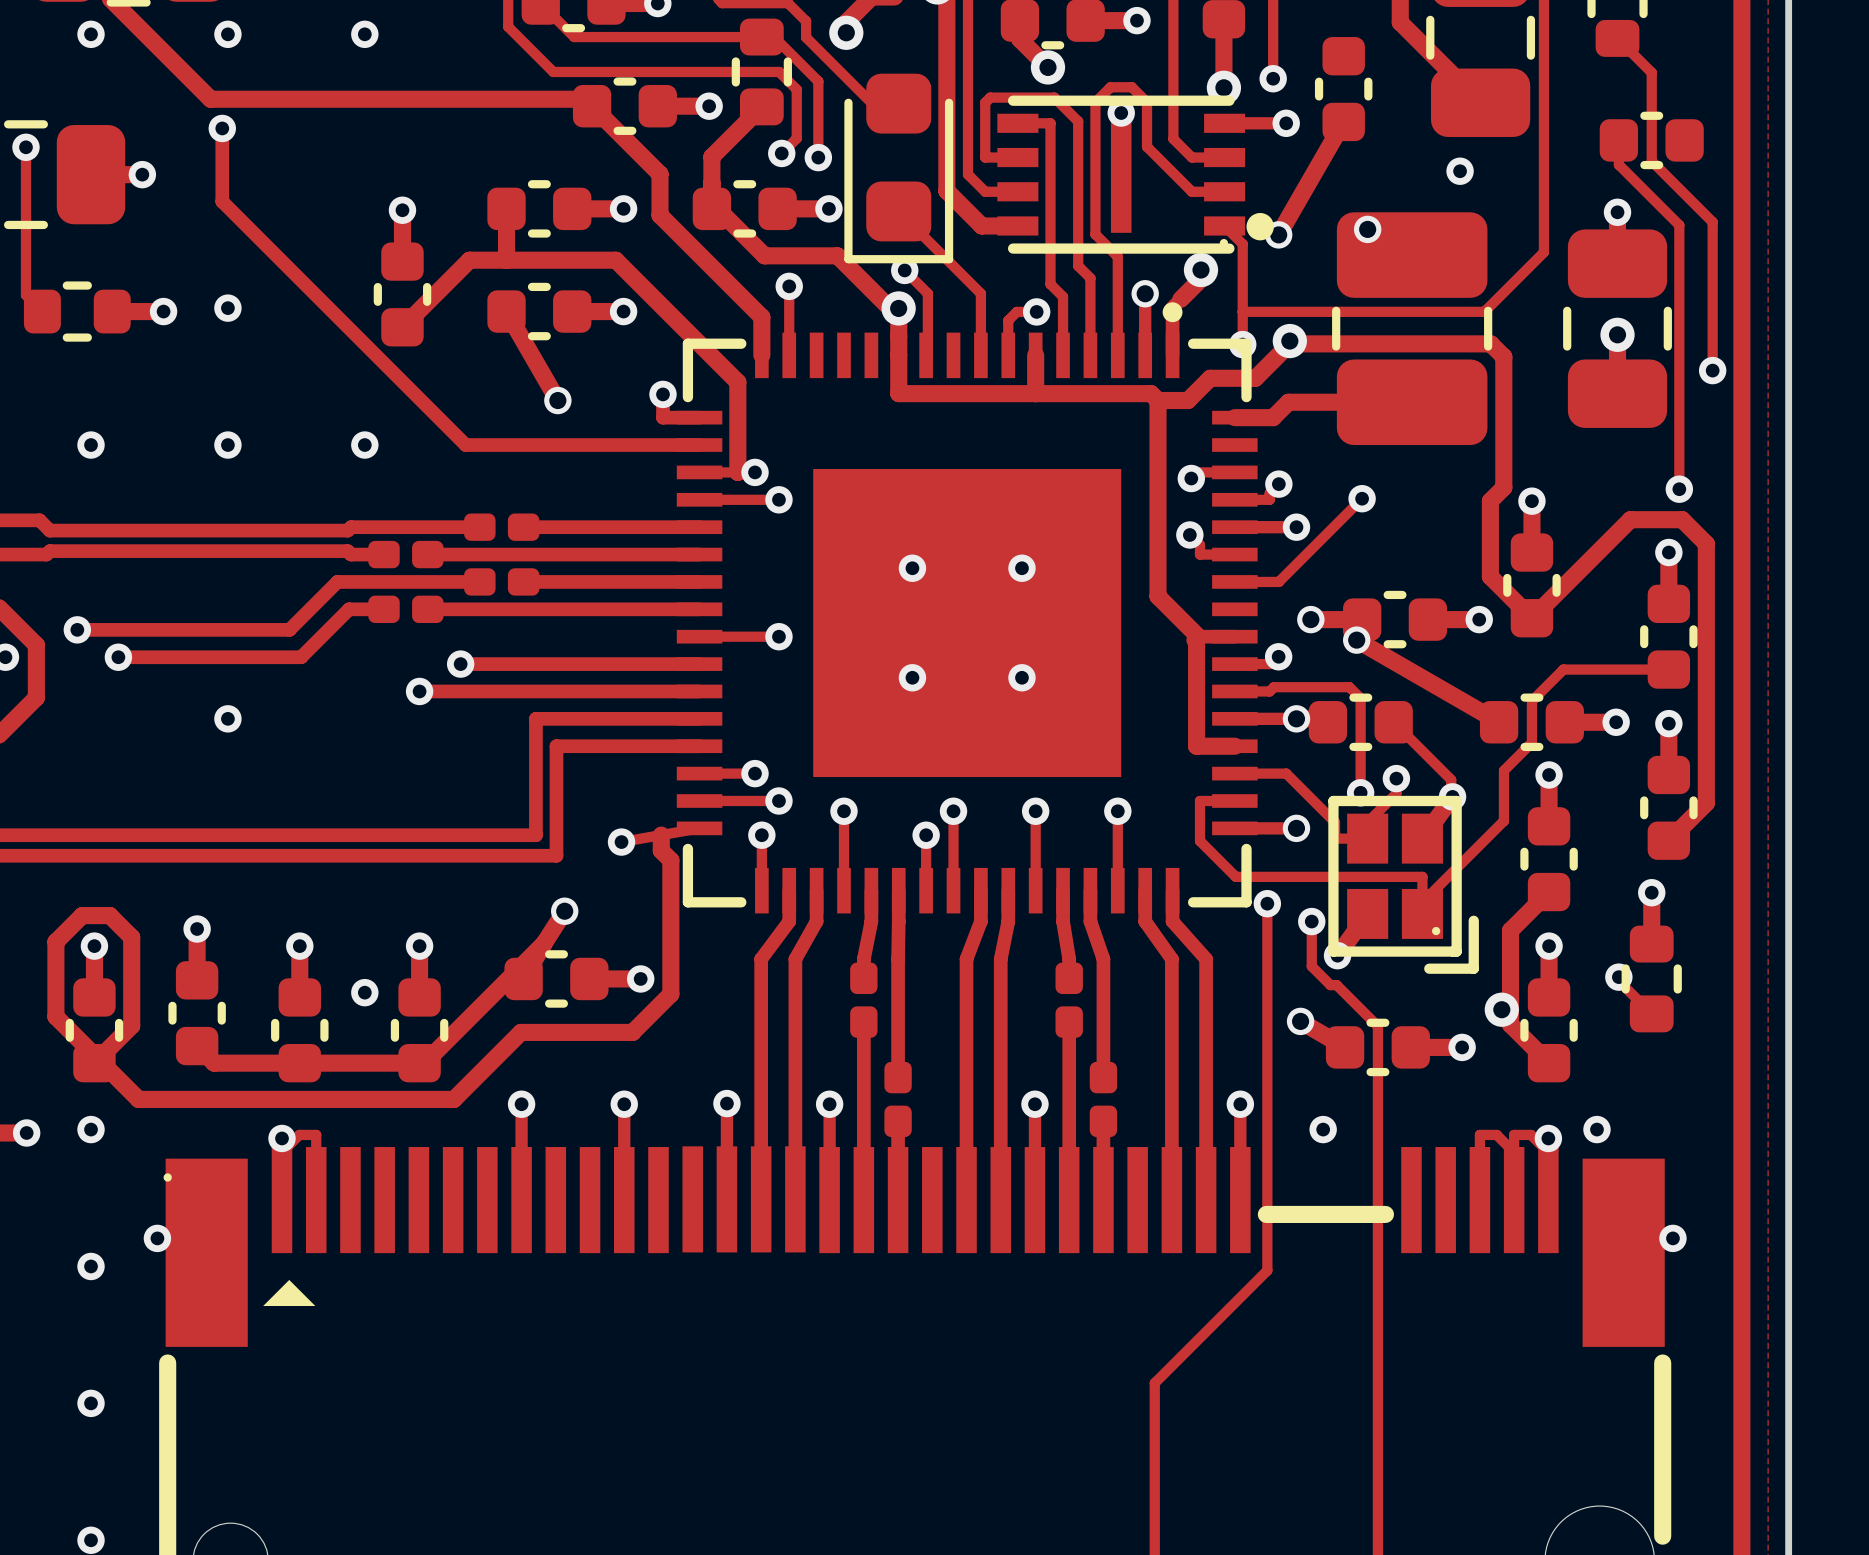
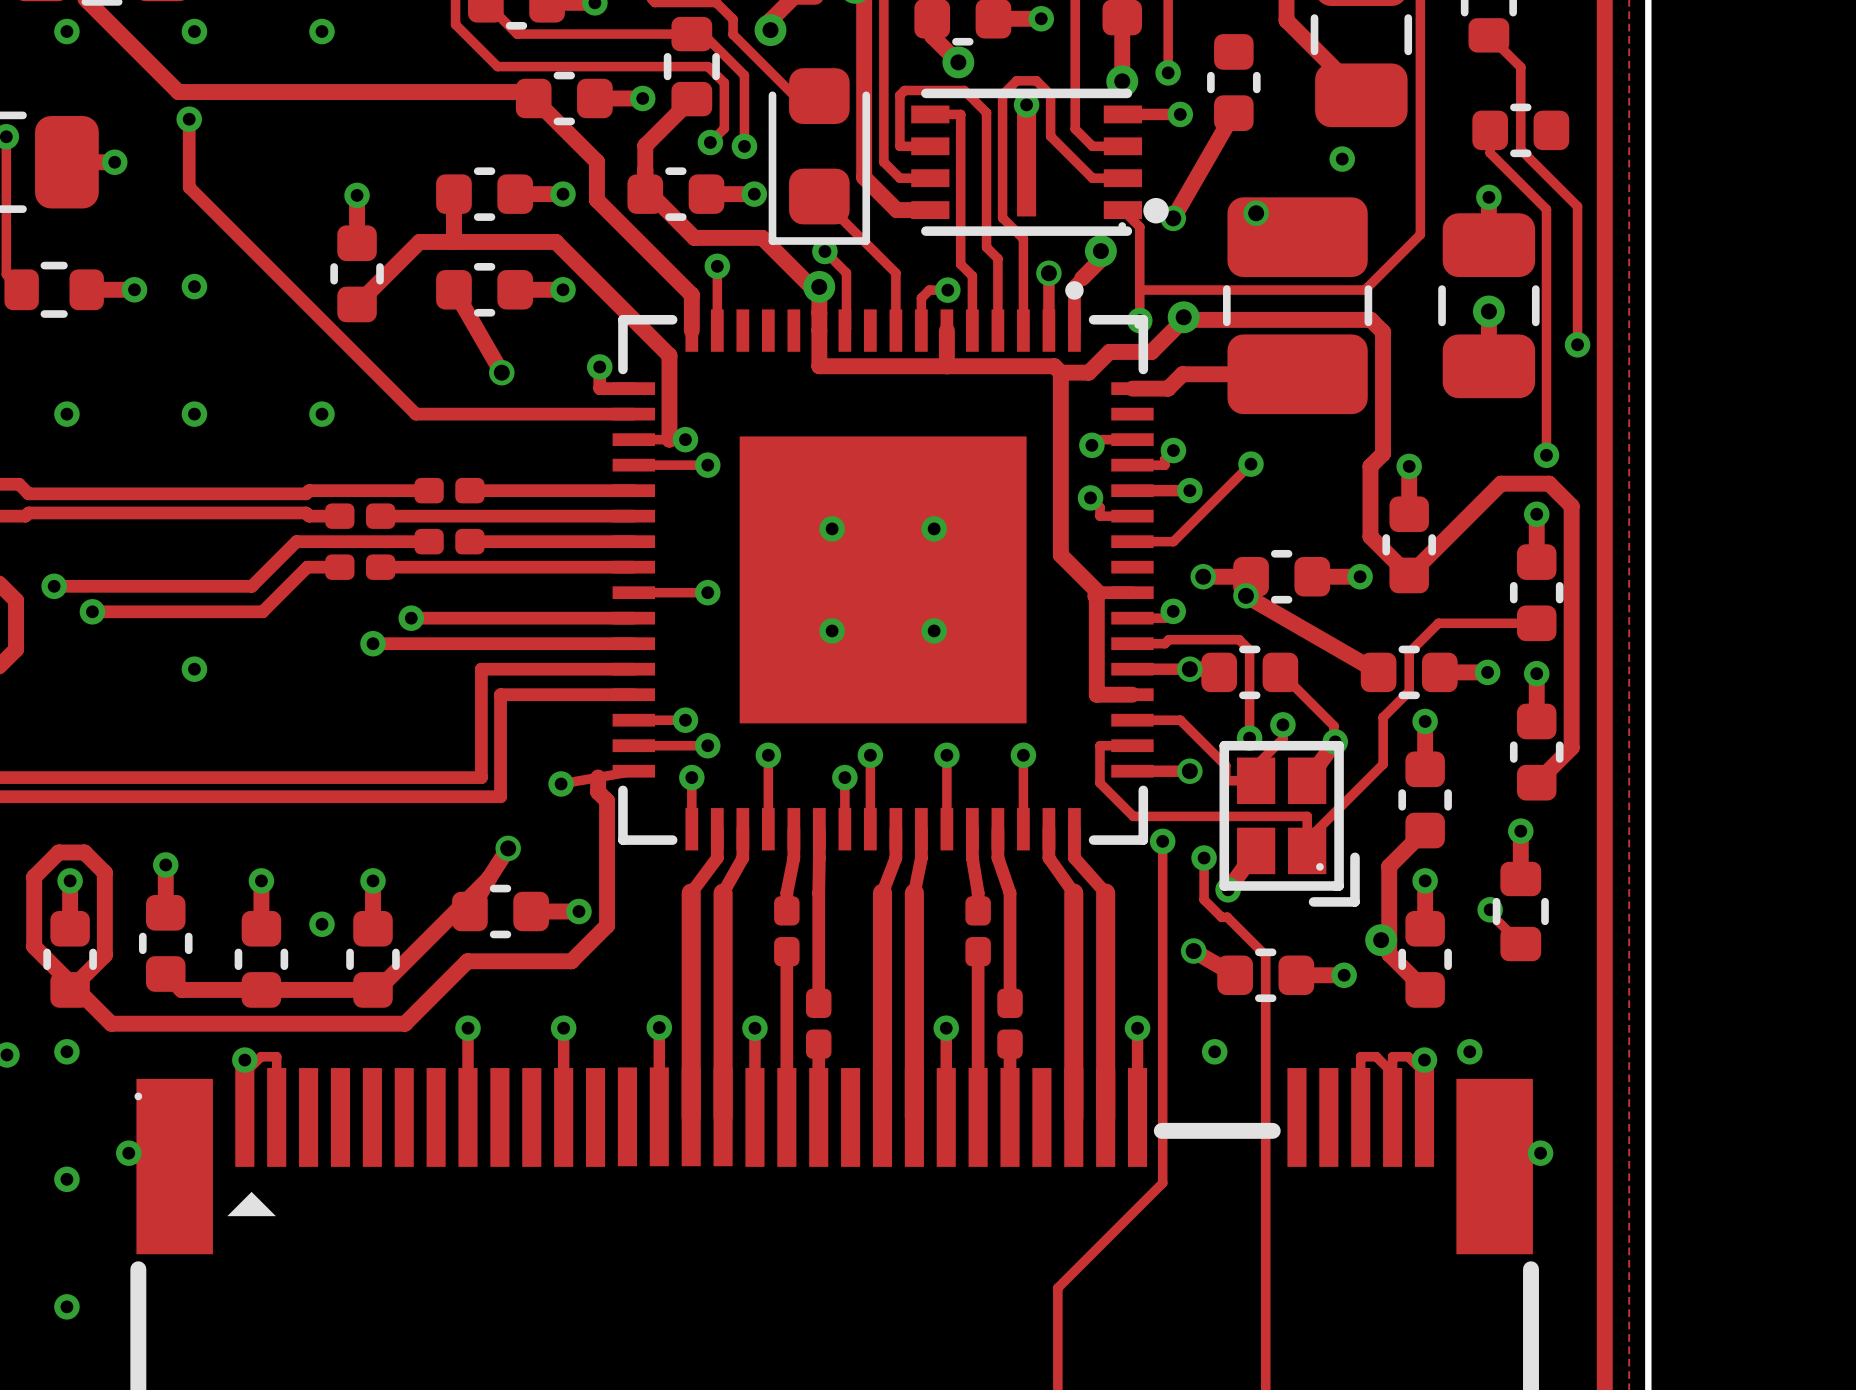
track width: thin (761, 959) (761, 1199) -> thick (691, 893) (691, 1116)
track width: thin (795, 959) (795, 1199) -> thick (723, 893) (723, 1116)
track width: thin (966, 959) (966, 1200) -> thick (882, 893) (882, 1117)
track width: thin (1000, 959) (1000, 1200) -> thick (914, 893) (914, 1117)
track width: thin (1171, 959) (1171, 1200) -> thick (1073, 893) (1073, 1117)
track width: thin (1206, 959) (1206, 1200) -> thick (1105, 893) (1105, 1117)

